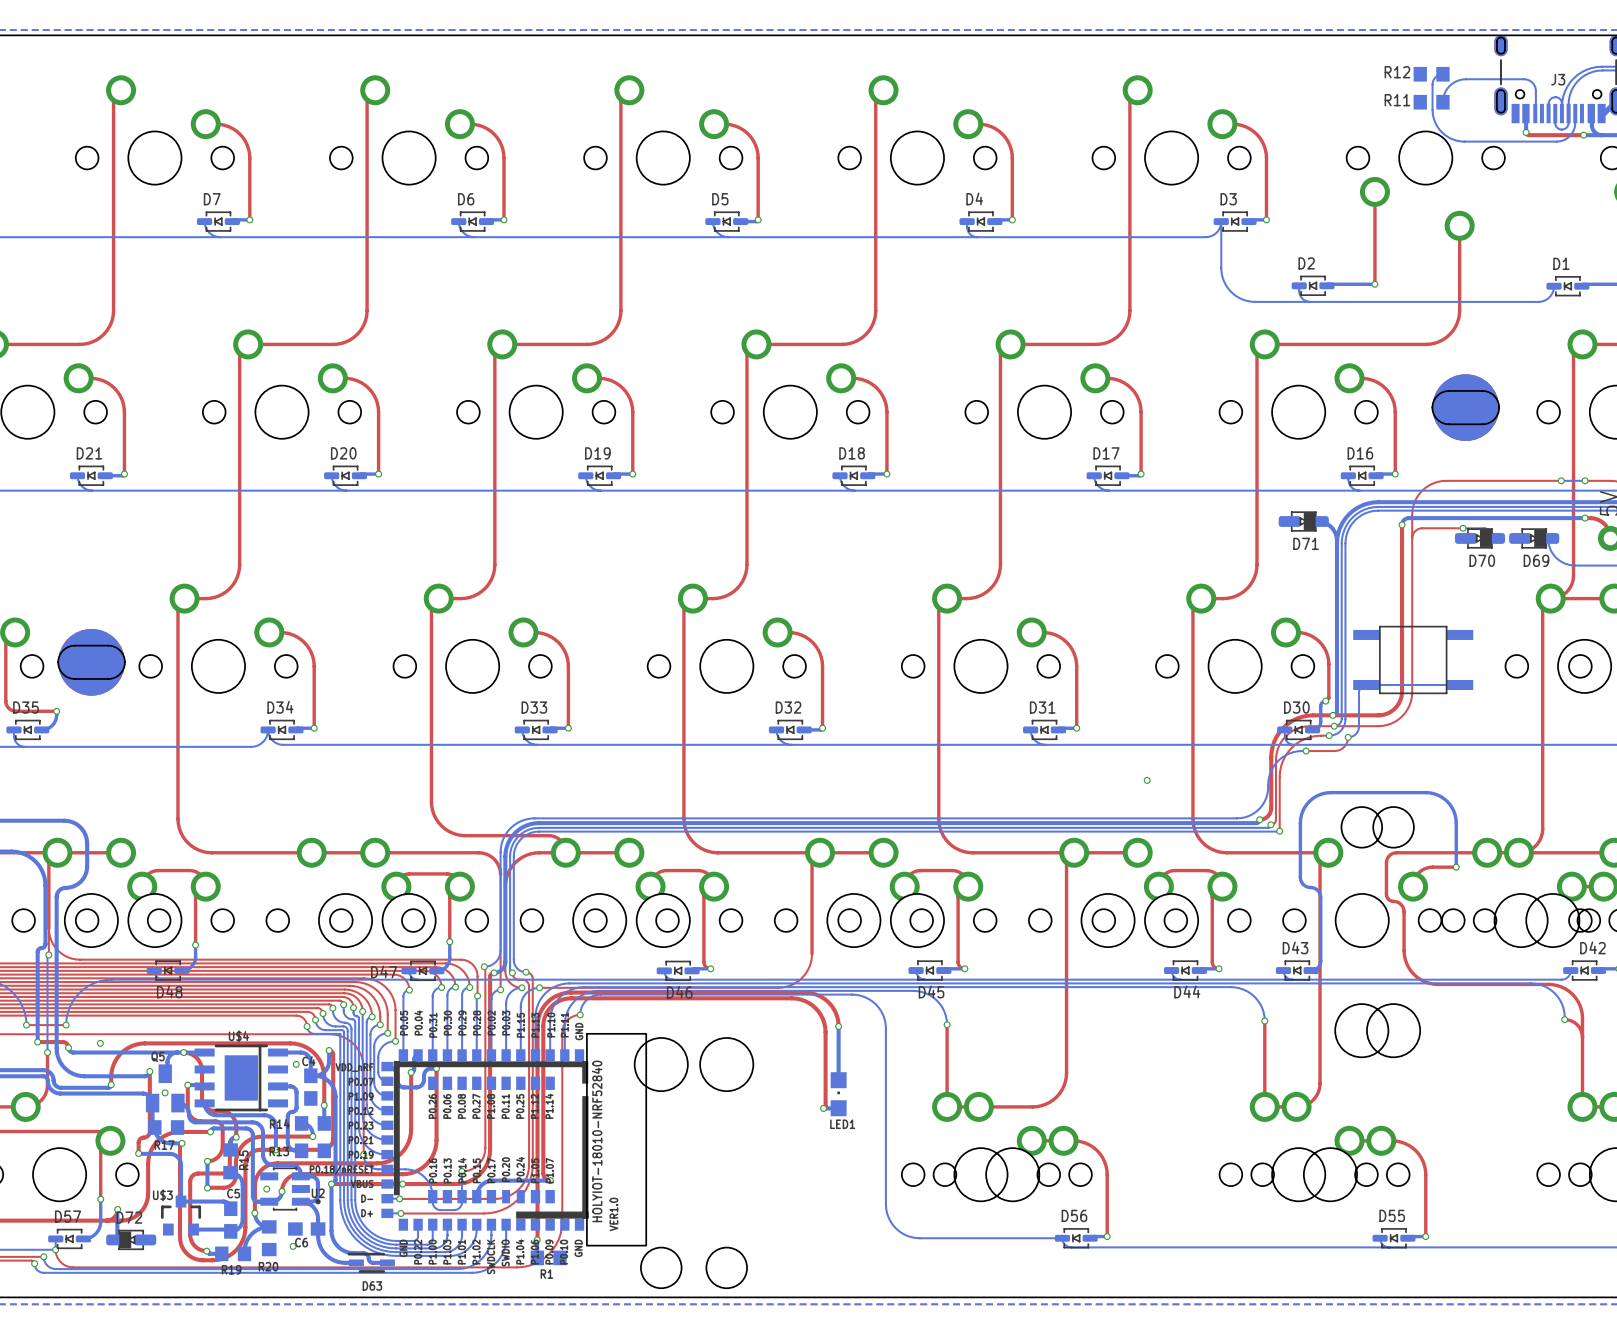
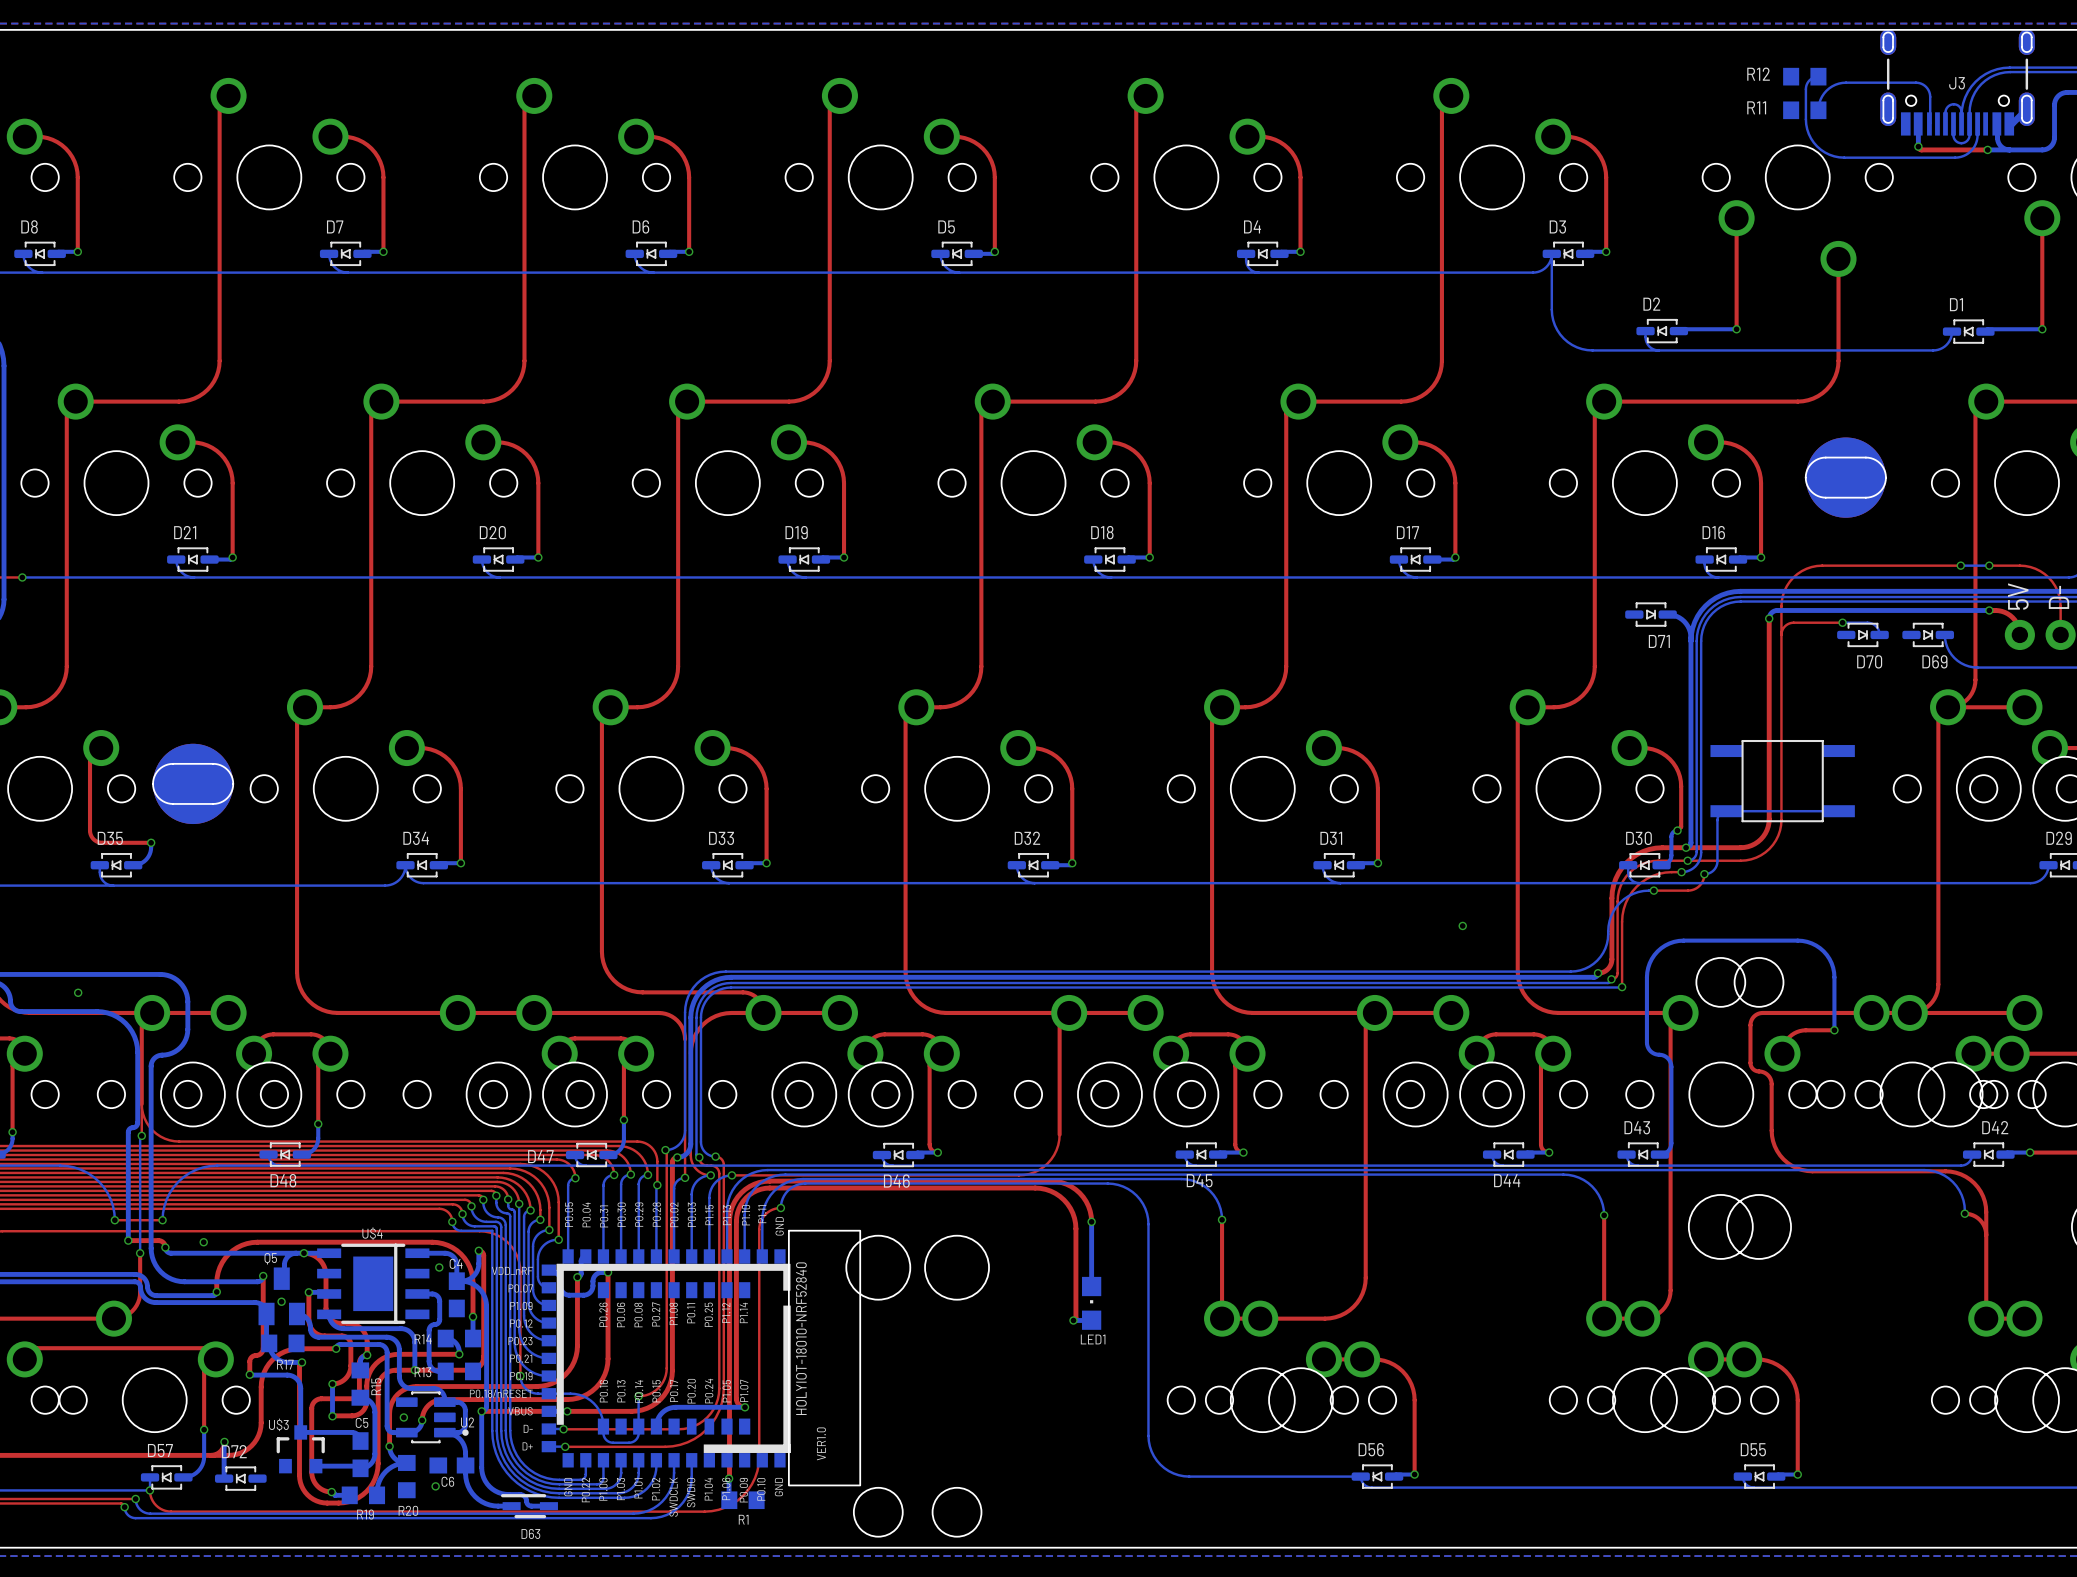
D71 footprint: [1278, 511, 1329, 532] -> [1625, 602, 1677, 627]
D70 footprint: [1454, 528, 1506, 549] -> [1837, 622, 1889, 648]
D69 footprint: [1509, 528, 1560, 549] -> [1902, 622, 1955, 648]
D72 footprint: [106, 1229, 157, 1251] -> [214, 1466, 267, 1491]

